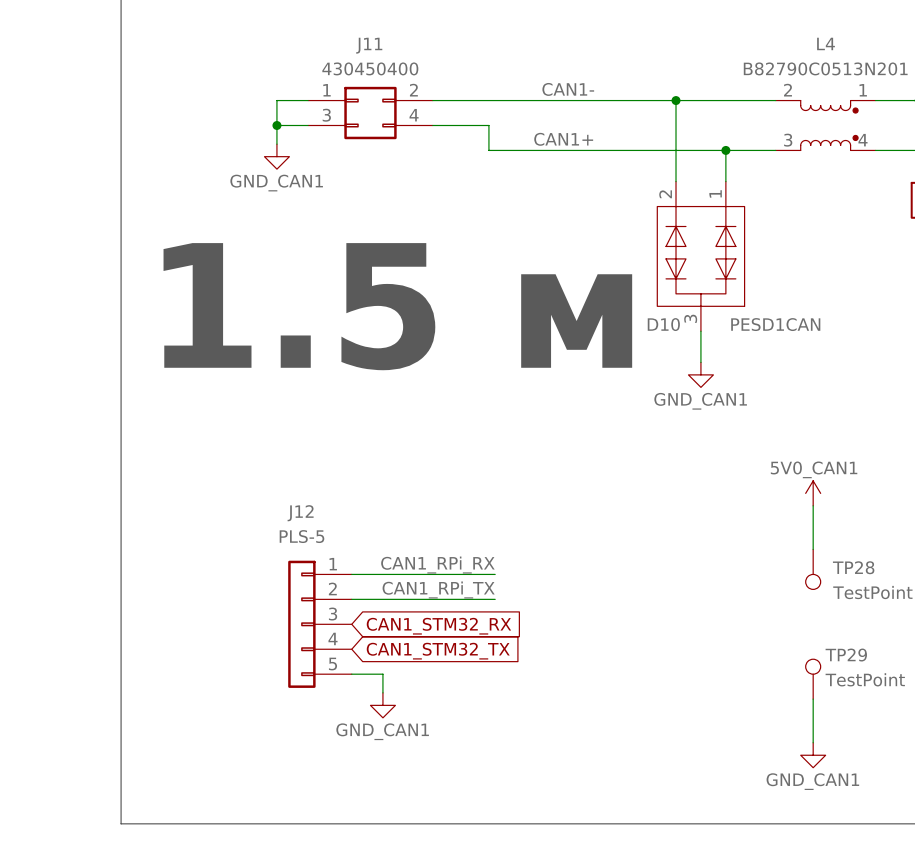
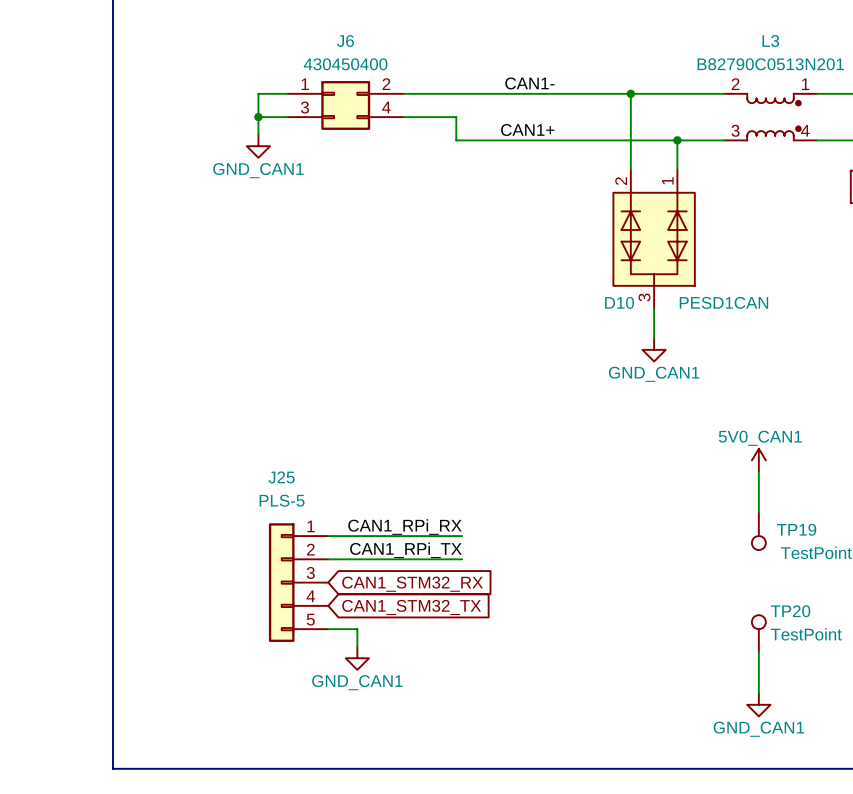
L4 name: L4 (826, 43) -> L3 (770, 41)
J11 name: J11 (369, 45) -> J6 (345, 41)
text: 1.5 м (397, 306) -> none
J12 name: J12 (300, 513) -> J25 (281, 477)
TP28 name: TP28 (853, 567) -> TP19 (796, 529)
TP29 name: TP29 (846, 655) -> TP20 (790, 611)

